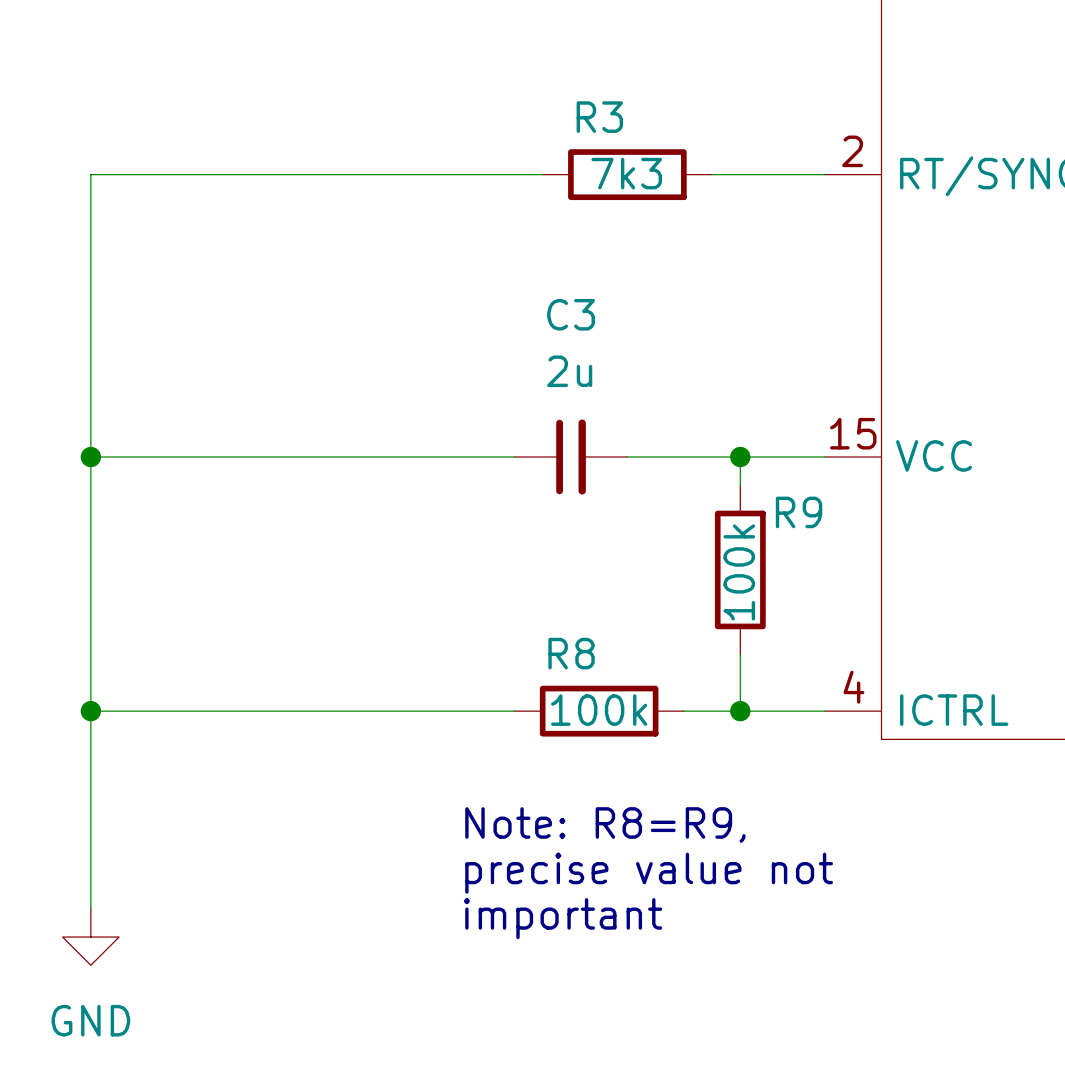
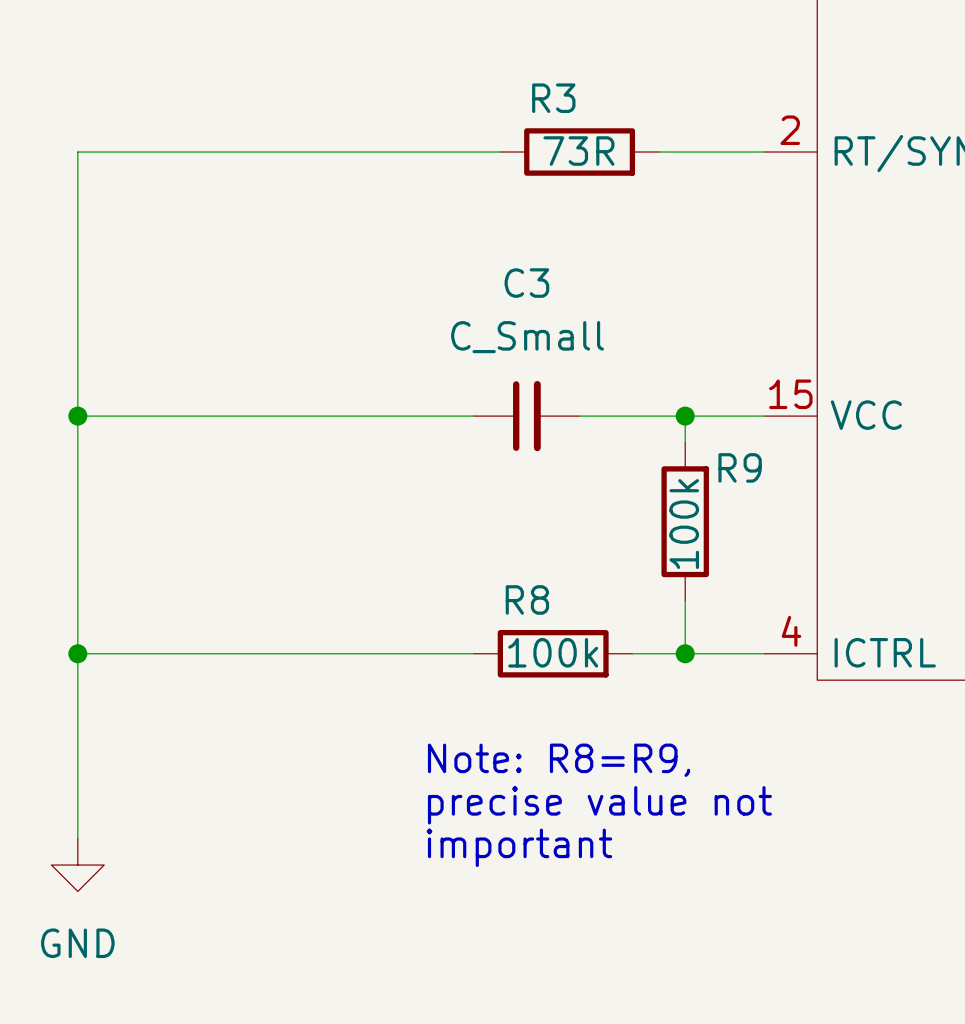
R3 value: 7k3 (626, 173) -> 73R (578, 151)
C3 value: 2u (569, 371) -> C_Small (527, 337)

